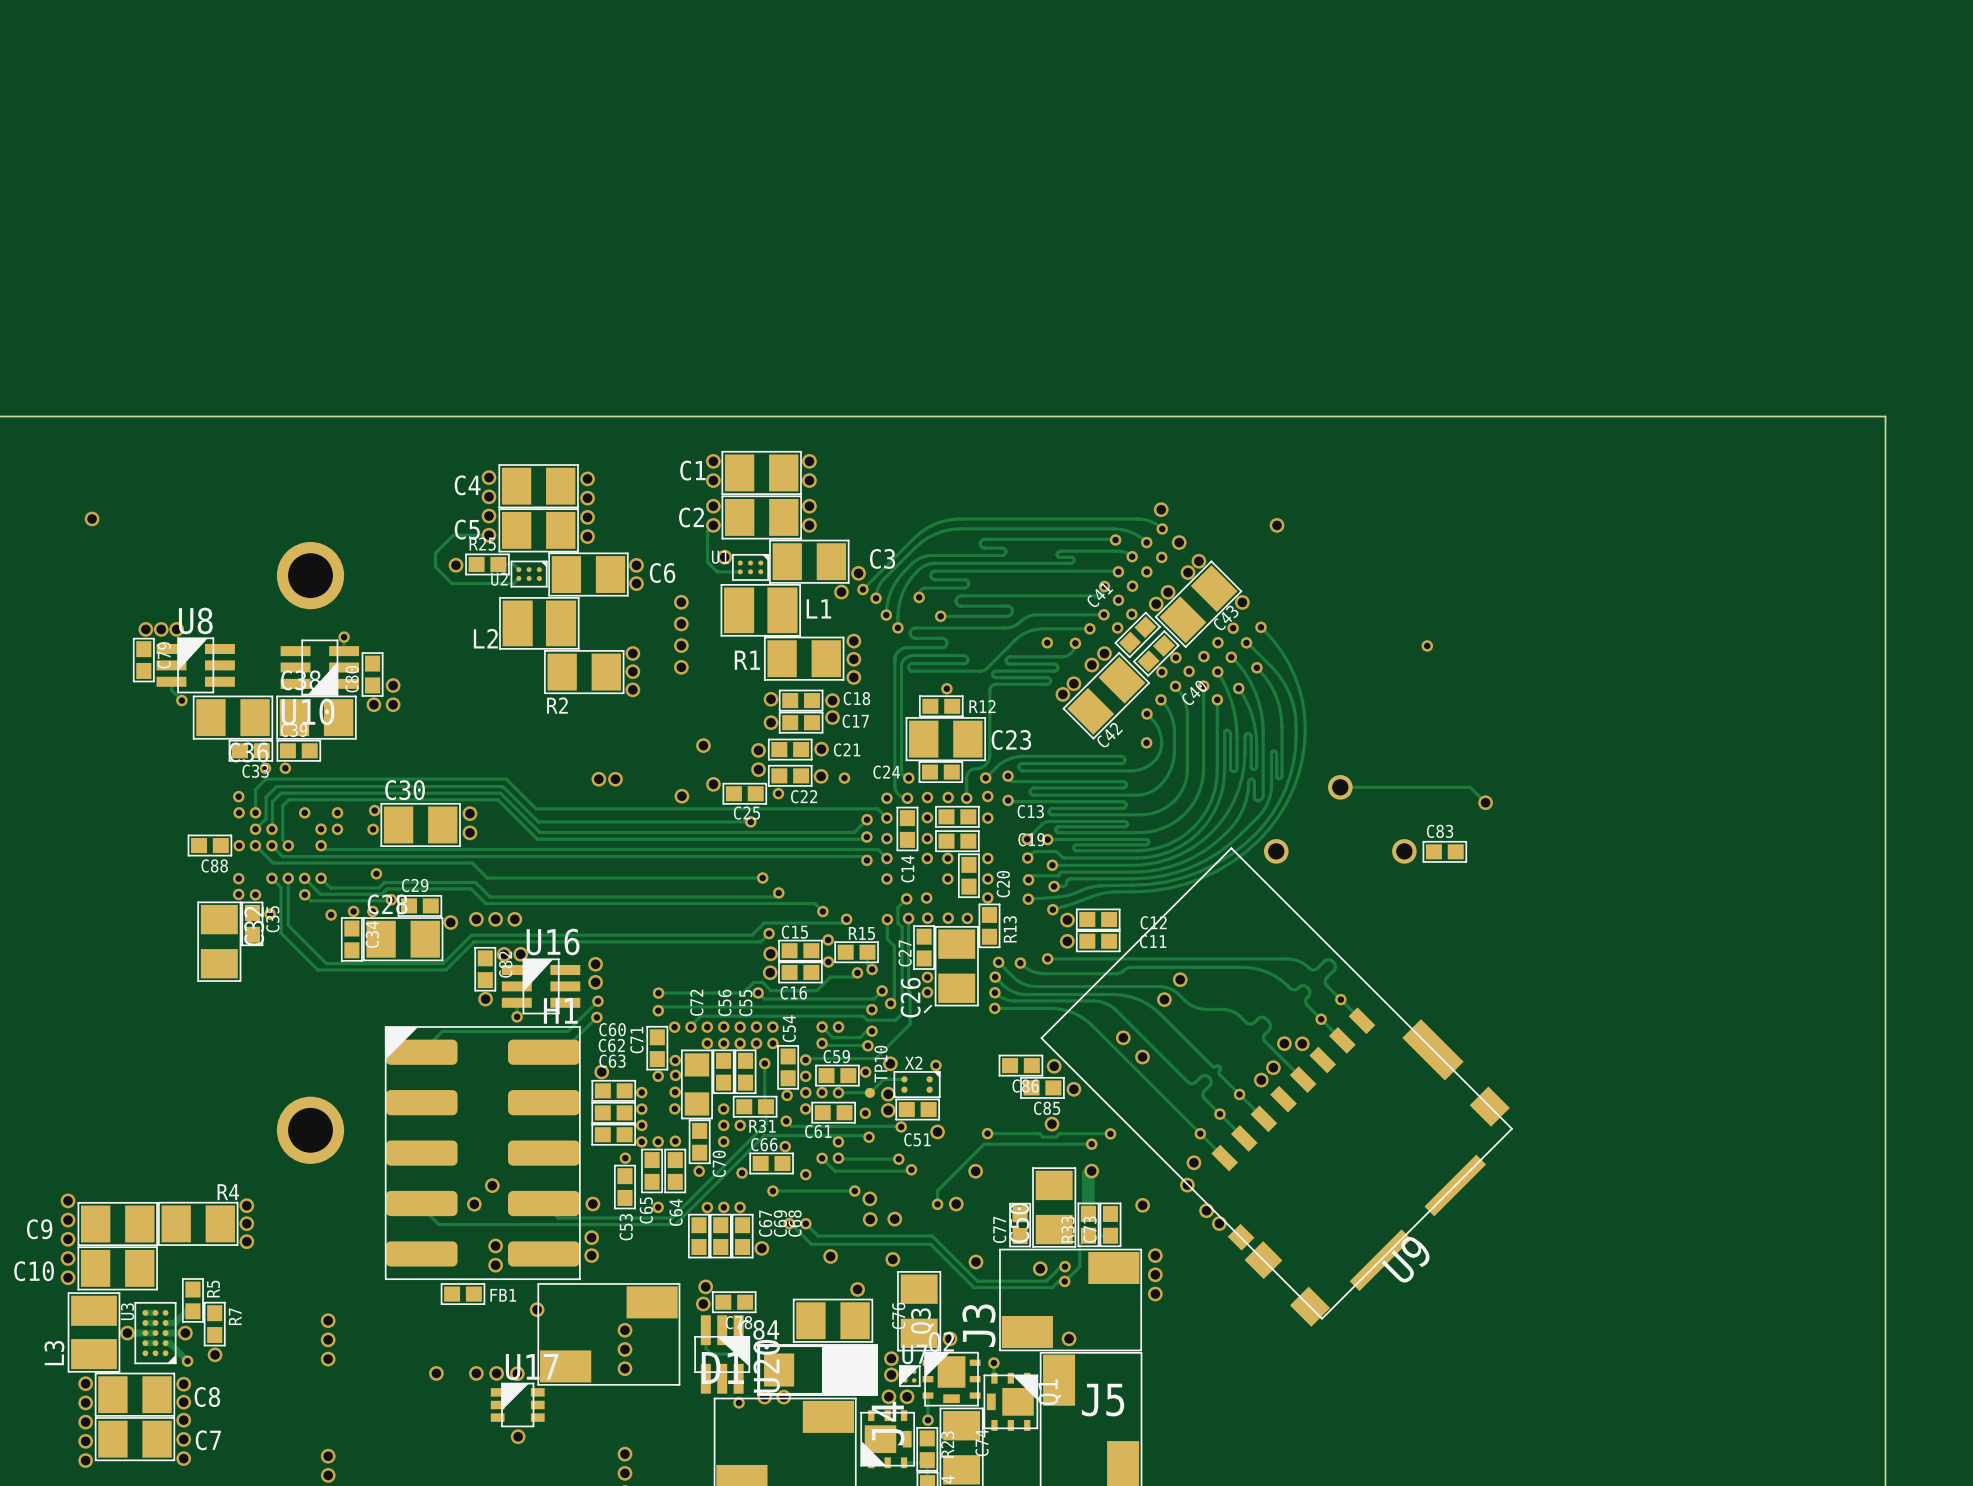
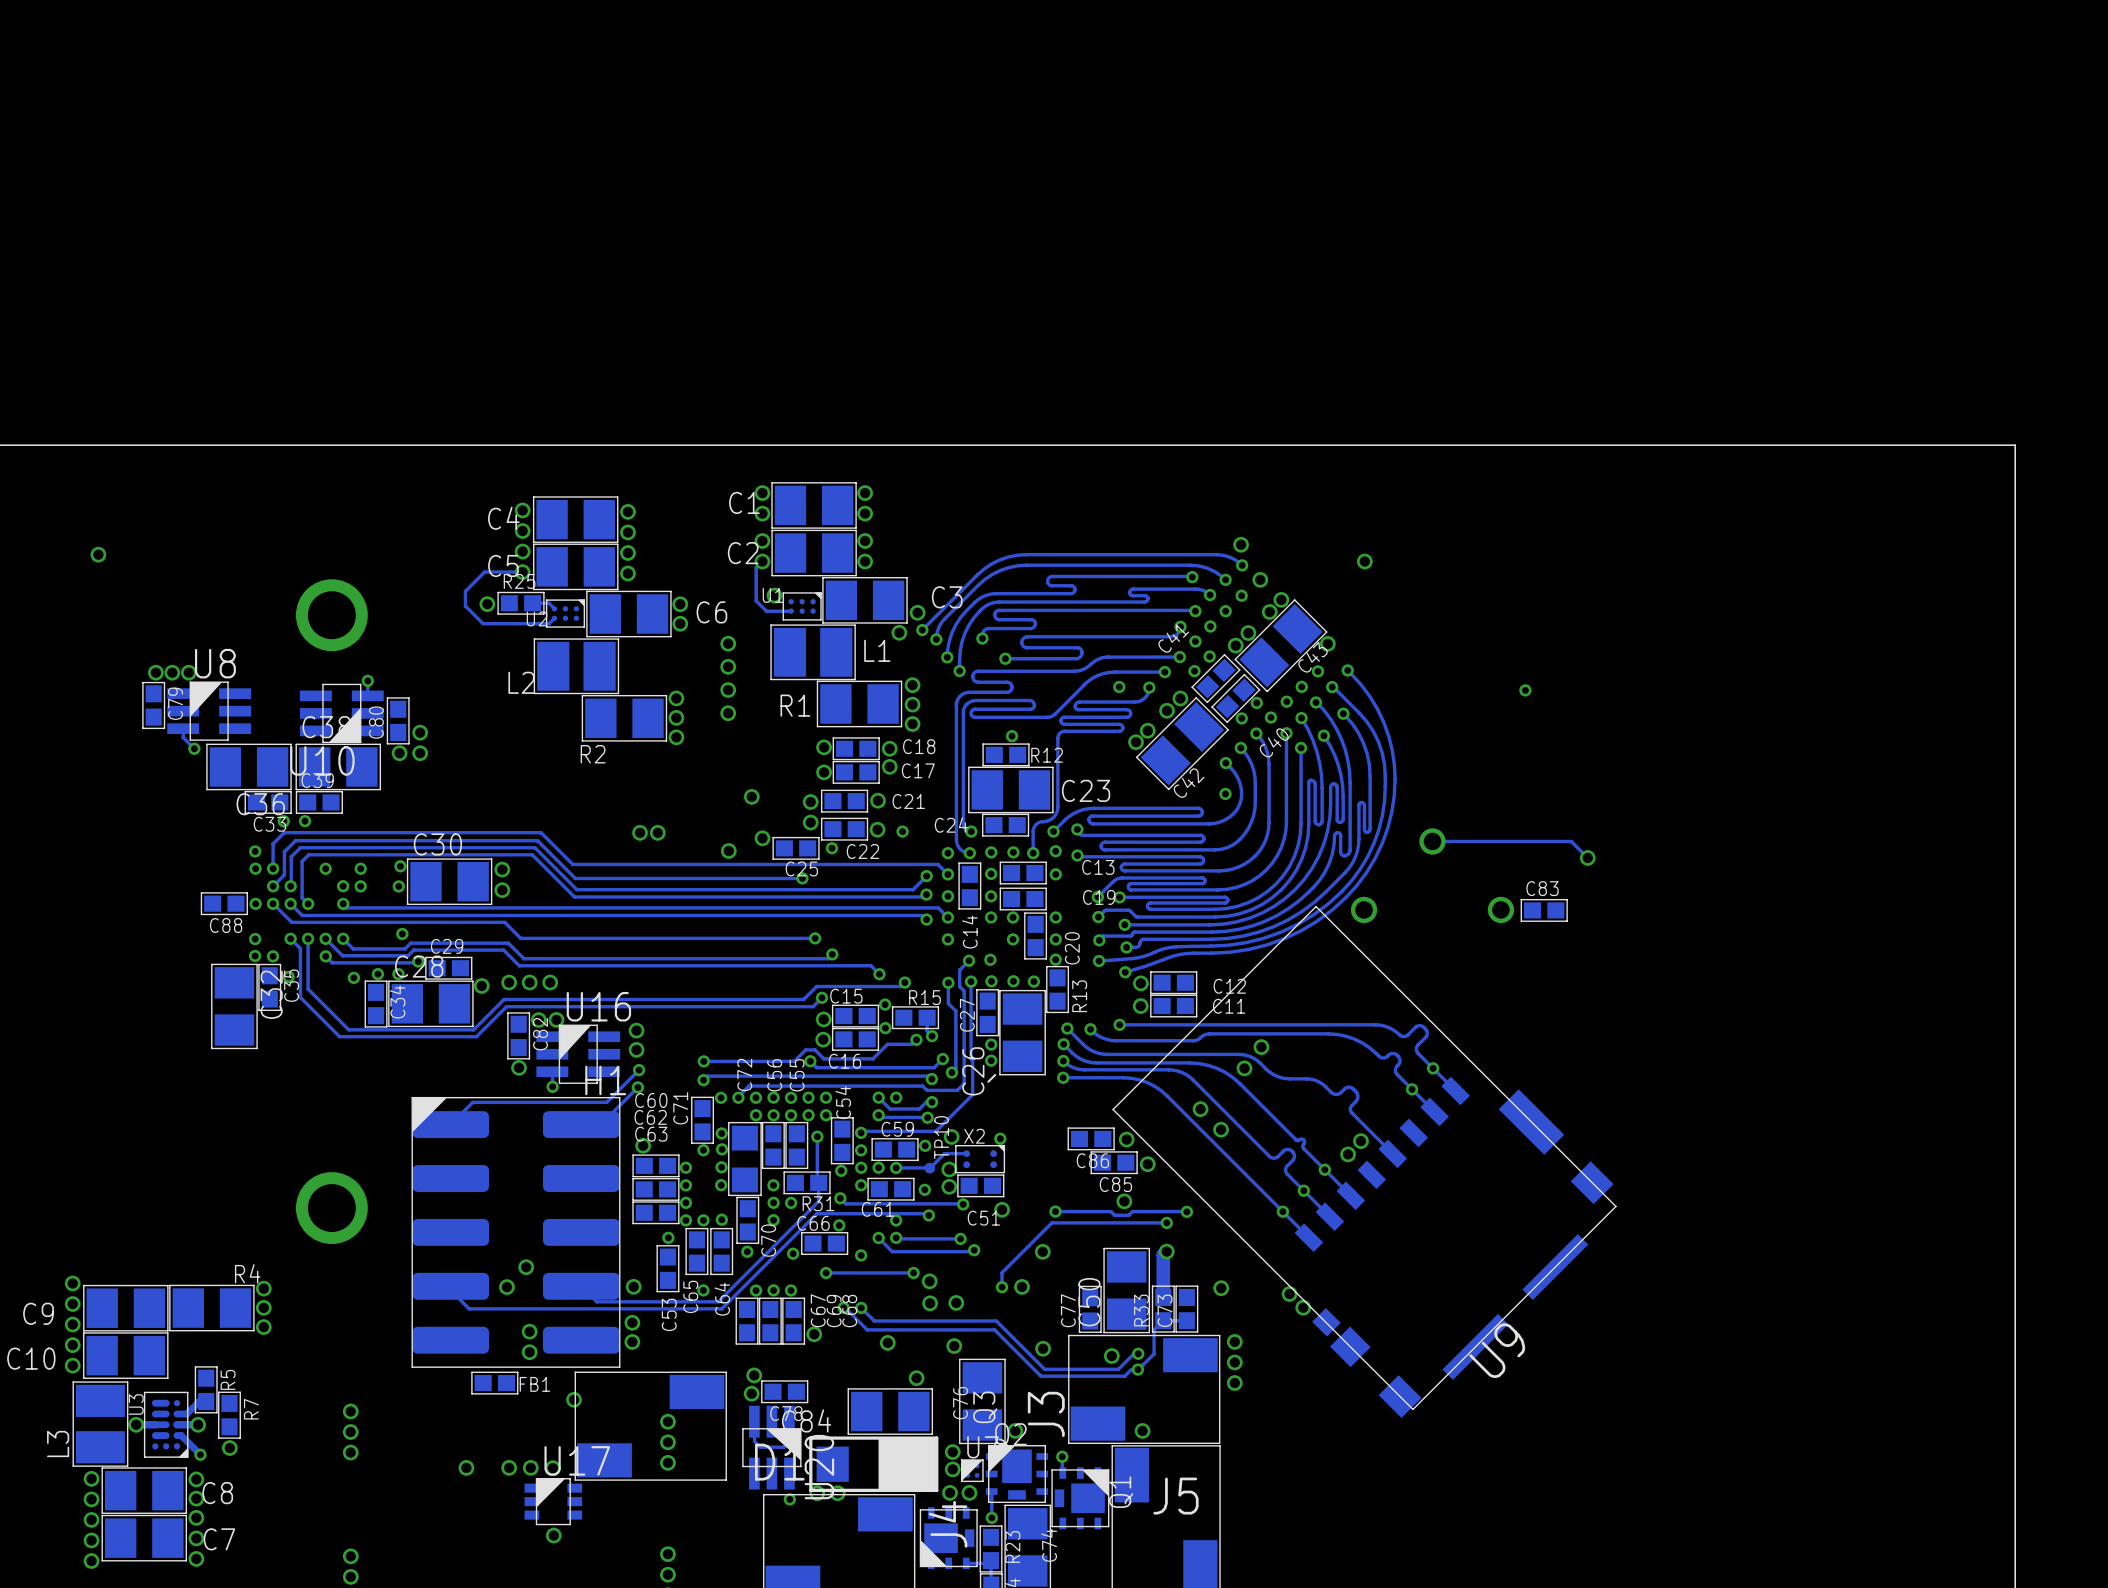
via: (1284, 1043) -> none
via: (1302, 1043) -> none
via: (1193, 1162) -> none
via: (1187, 1185) -> none

